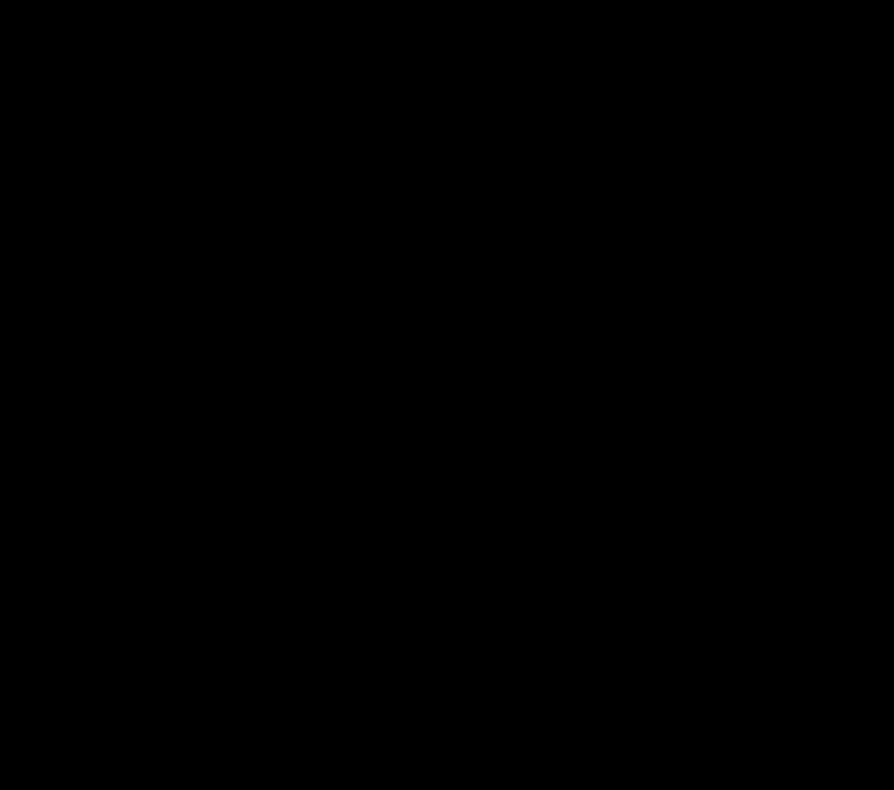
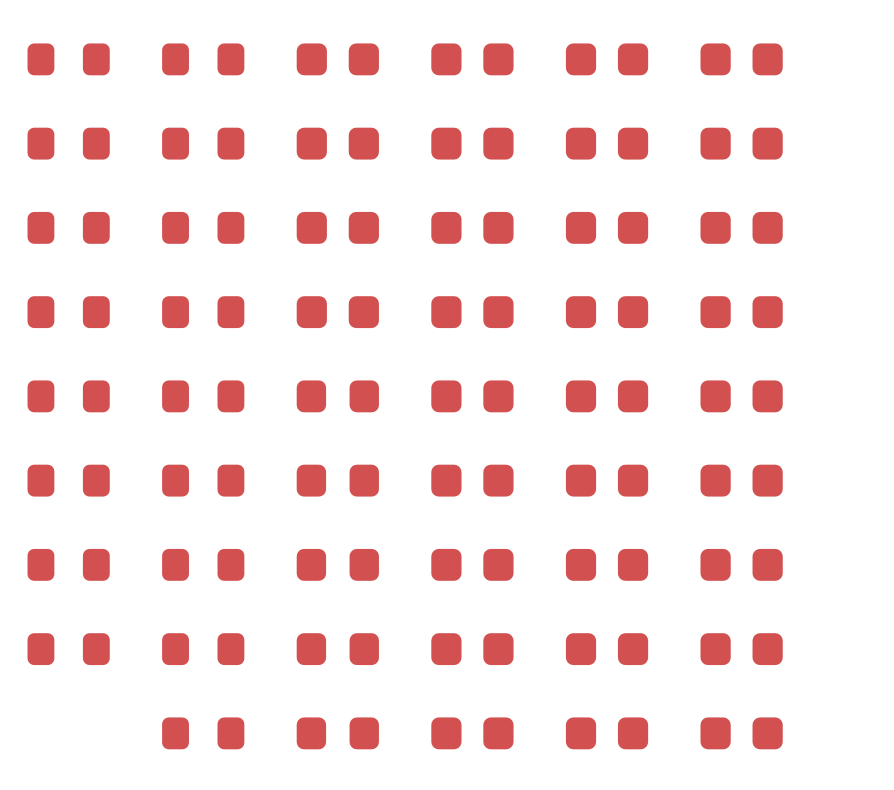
part: none -> (68, 59)
part: none -> (203, 59)
part: none -> (337, 59)
part: none -> (472, 59)
part: none -> (607, 59)
part: none -> (741, 59)
part: none -> (68, 143)
part: none -> (203, 143)
part: none -> (337, 143)
part: none -> (472, 143)
part: none -> (607, 143)
part: none -> (741, 143)
part: none -> (68, 227)
part: none -> (203, 227)
part: none -> (337, 227)
part: none -> (472, 227)
part: none -> (607, 227)
part: none -> (741, 227)
part: none -> (68, 312)
part: none -> (203, 312)
part: none -> (337, 312)
part: none -> (472, 312)
part: none -> (607, 312)
part: none -> (741, 312)
part: none -> (68, 396)
part: none -> (203, 396)
part: none -> (337, 396)
part: none -> (472, 396)
part: none -> (607, 396)
part: none -> (741, 396)
part: none -> (68, 480)
part: none -> (203, 480)
part: none -> (337, 480)
part: none -> (472, 480)
part: none -> (607, 480)
part: none -> (741, 480)
part: none -> (68, 564)
part: none -> (203, 564)
part: none -> (337, 564)
part: none -> (472, 564)
part: none -> (607, 564)
part: none -> (741, 564)
part: none -> (68, 649)
part: none -> (203, 649)
part: none -> (337, 649)
part: none -> (472, 649)
part: none -> (607, 649)
part: none -> (741, 649)
part: none -> (203, 733)
part: none -> (337, 733)
part: none -> (472, 733)
part: none -> (607, 733)
part: none -> (741, 733)

